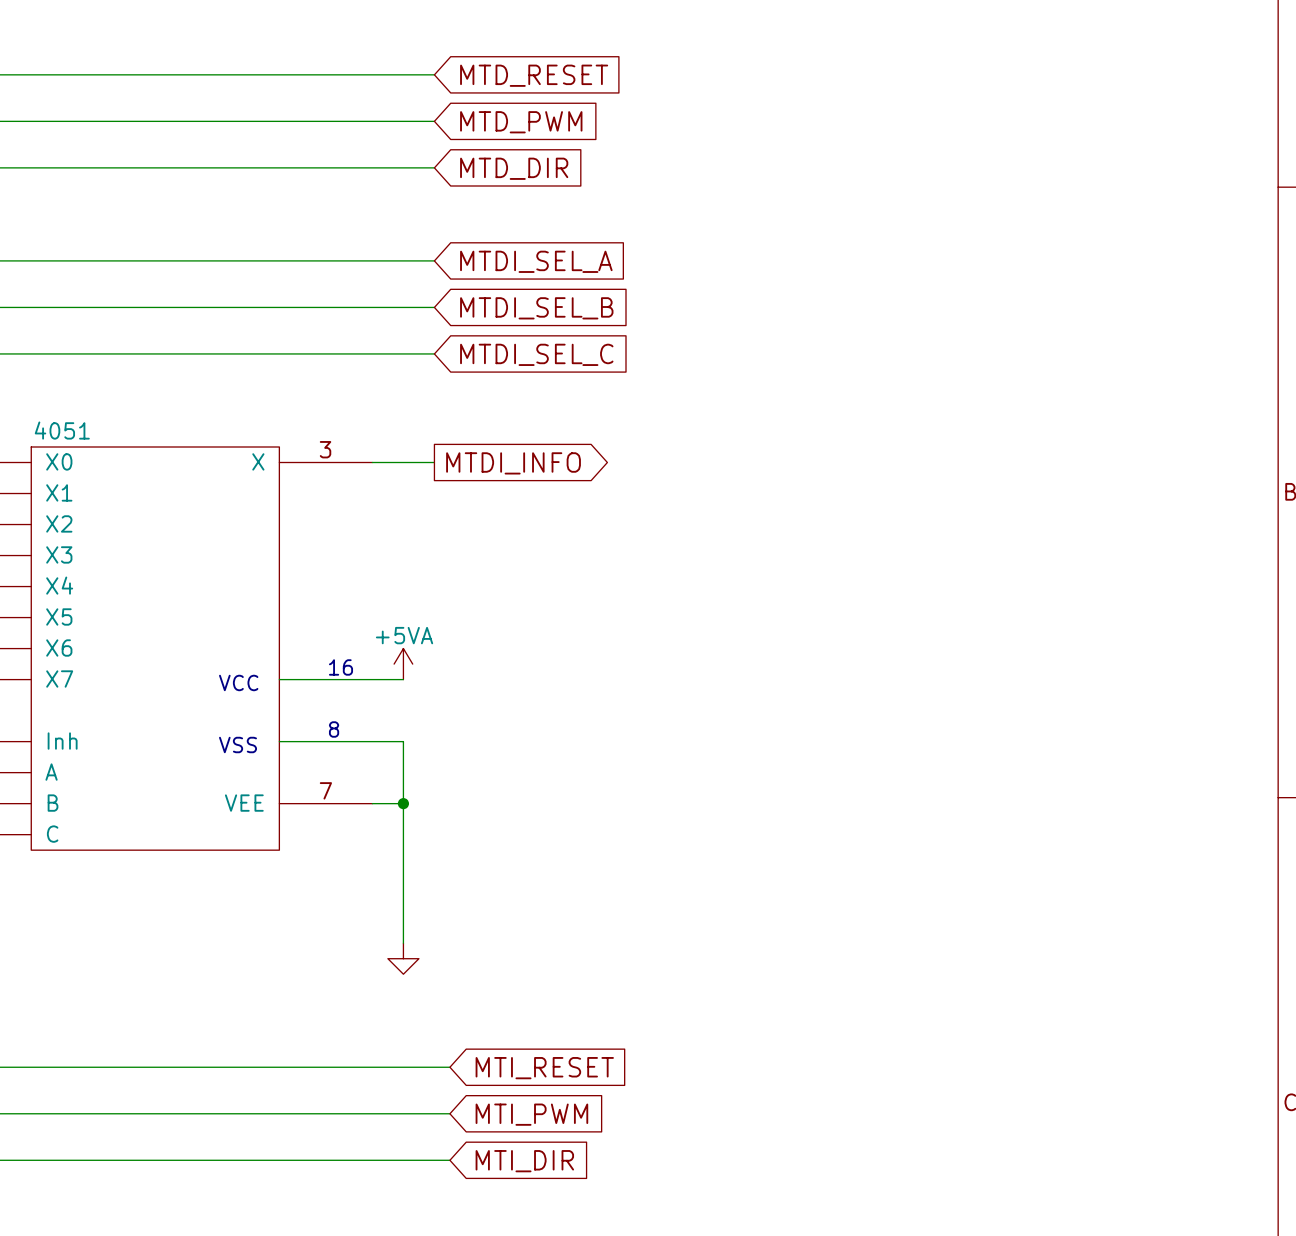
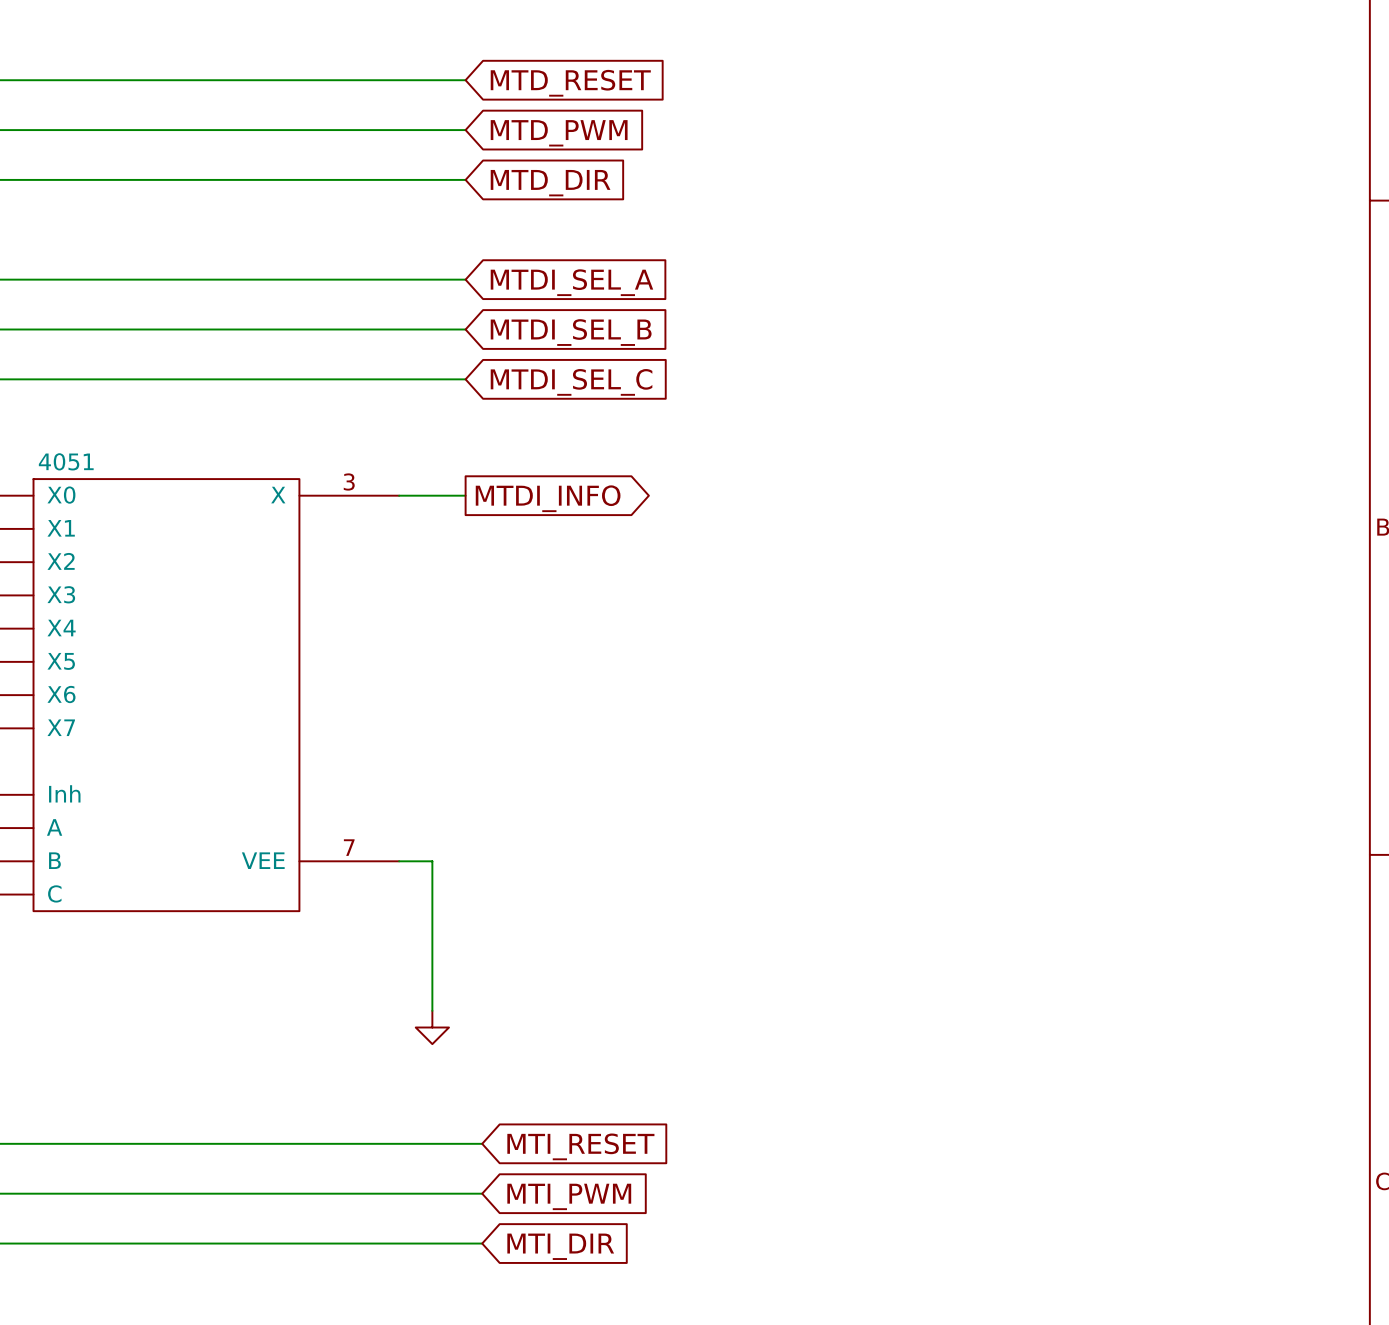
power symbol: +5VA (403, 664) -> none
text: 16 (340, 667) -> none
wire: (279, 679) (403, 679) -> none
text: VCC (238, 682) -> none
text: 8 (334, 729) -> none
wire: (279, 741) (403, 741) (403, 803) -> none
text: VSS (238, 745) -> none
junction: (403, 803) -> none

